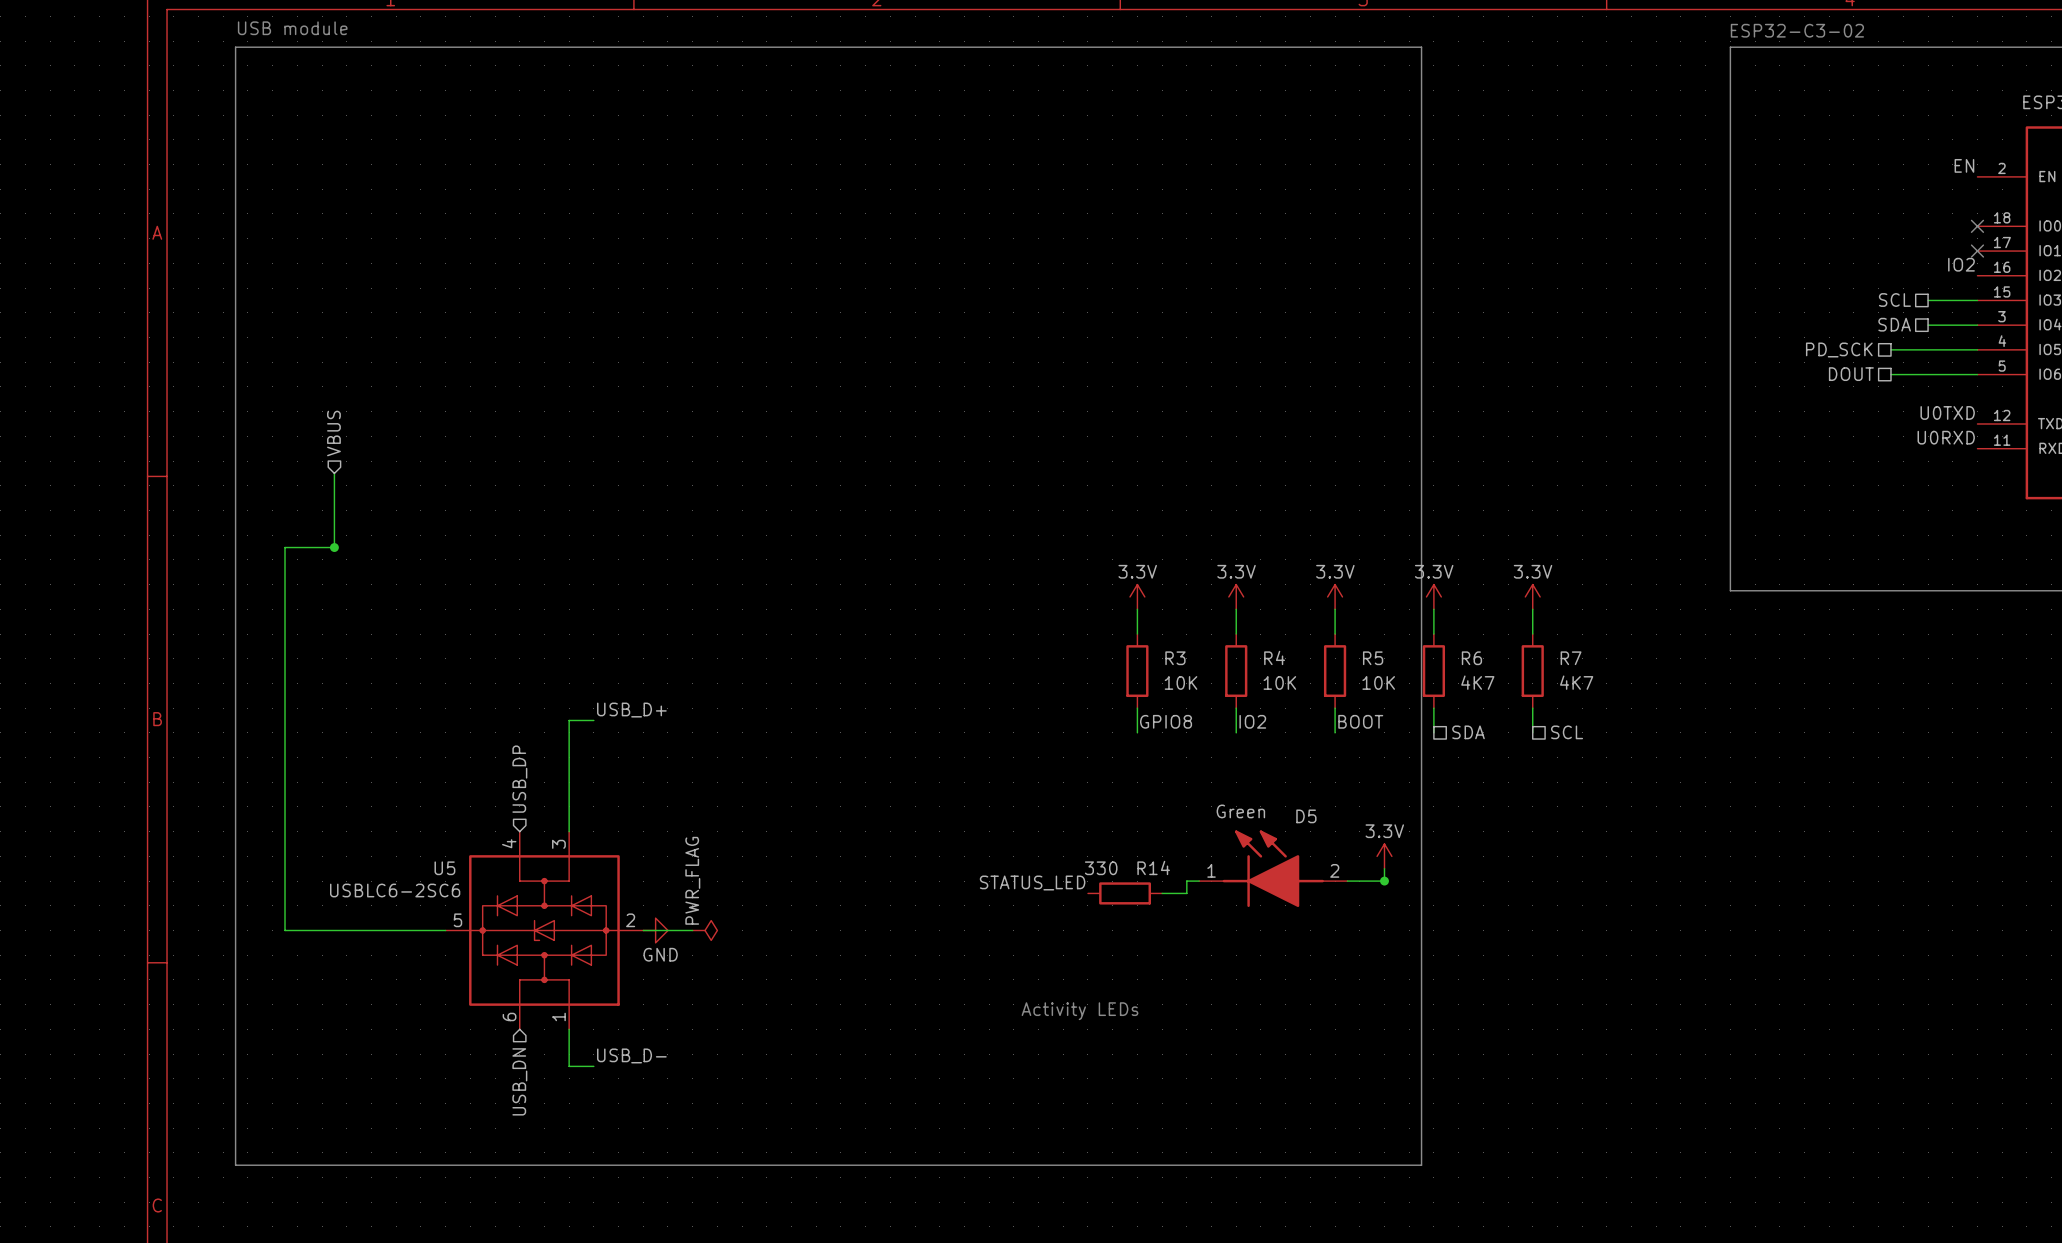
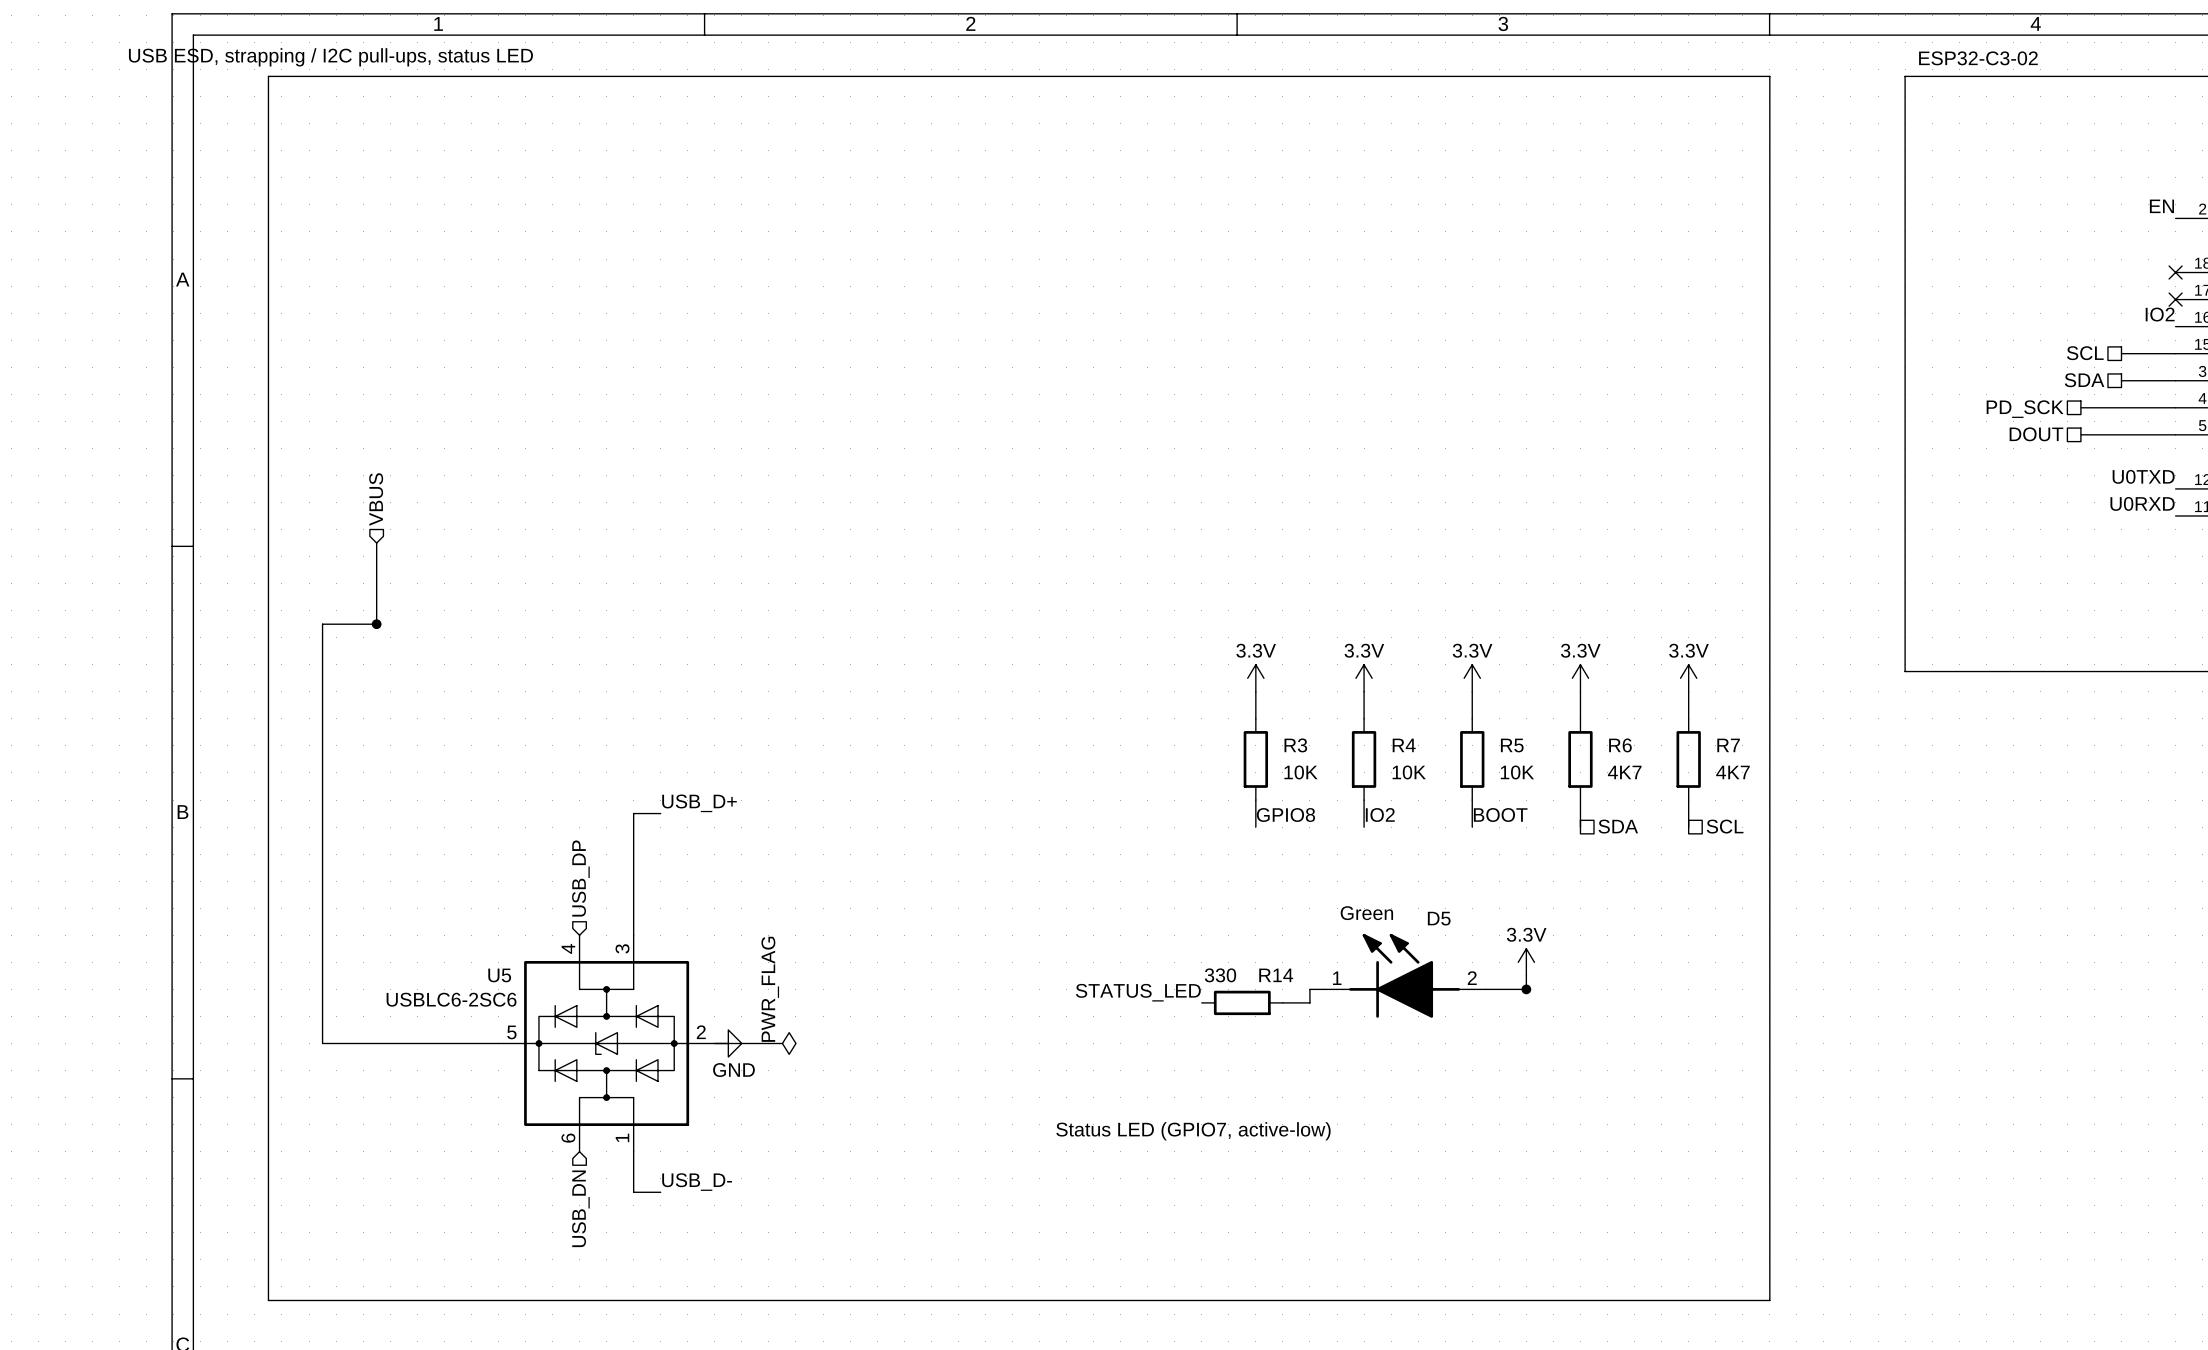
text: USB module (292, 28) -> USB ESD, strapping / I2C pull-ups, status LED (330, 57)
line: (1421, 47) (1421, 1165) -> (1566, 76) (1769, 76) (1769, 1300) (1566, 1300)
text: Activity LEDs (1079, 1011) -> Status LED (GPIO7, active-low) (1193, 1131)

